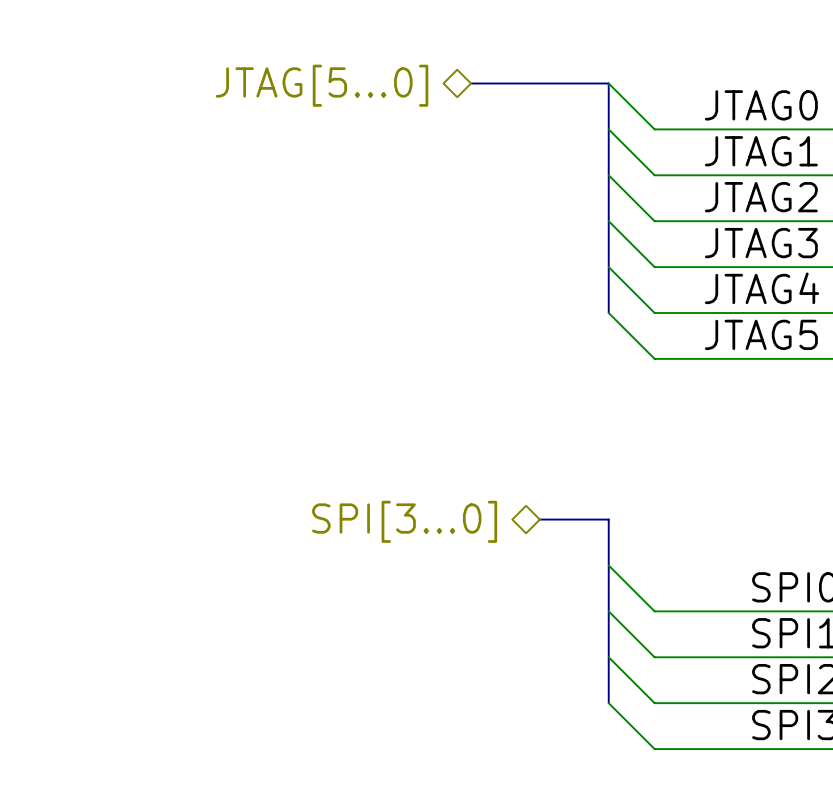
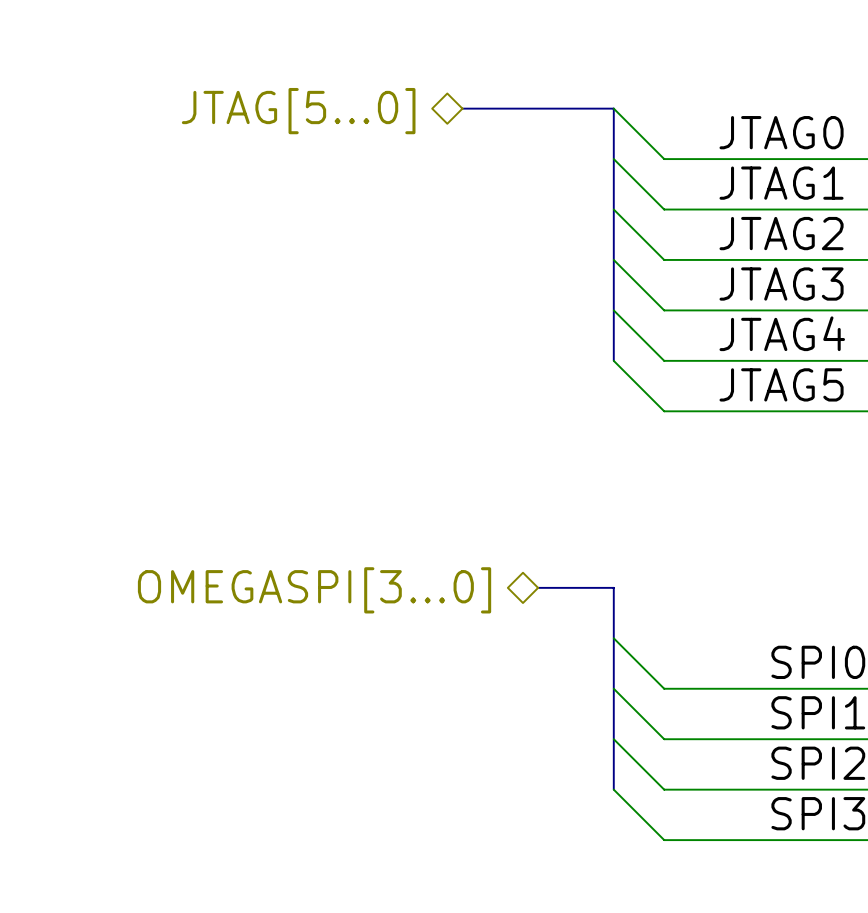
hierarchical label: SPI[3...0] (404, 521) -> OMEGASPI[3...0] (314, 590)

